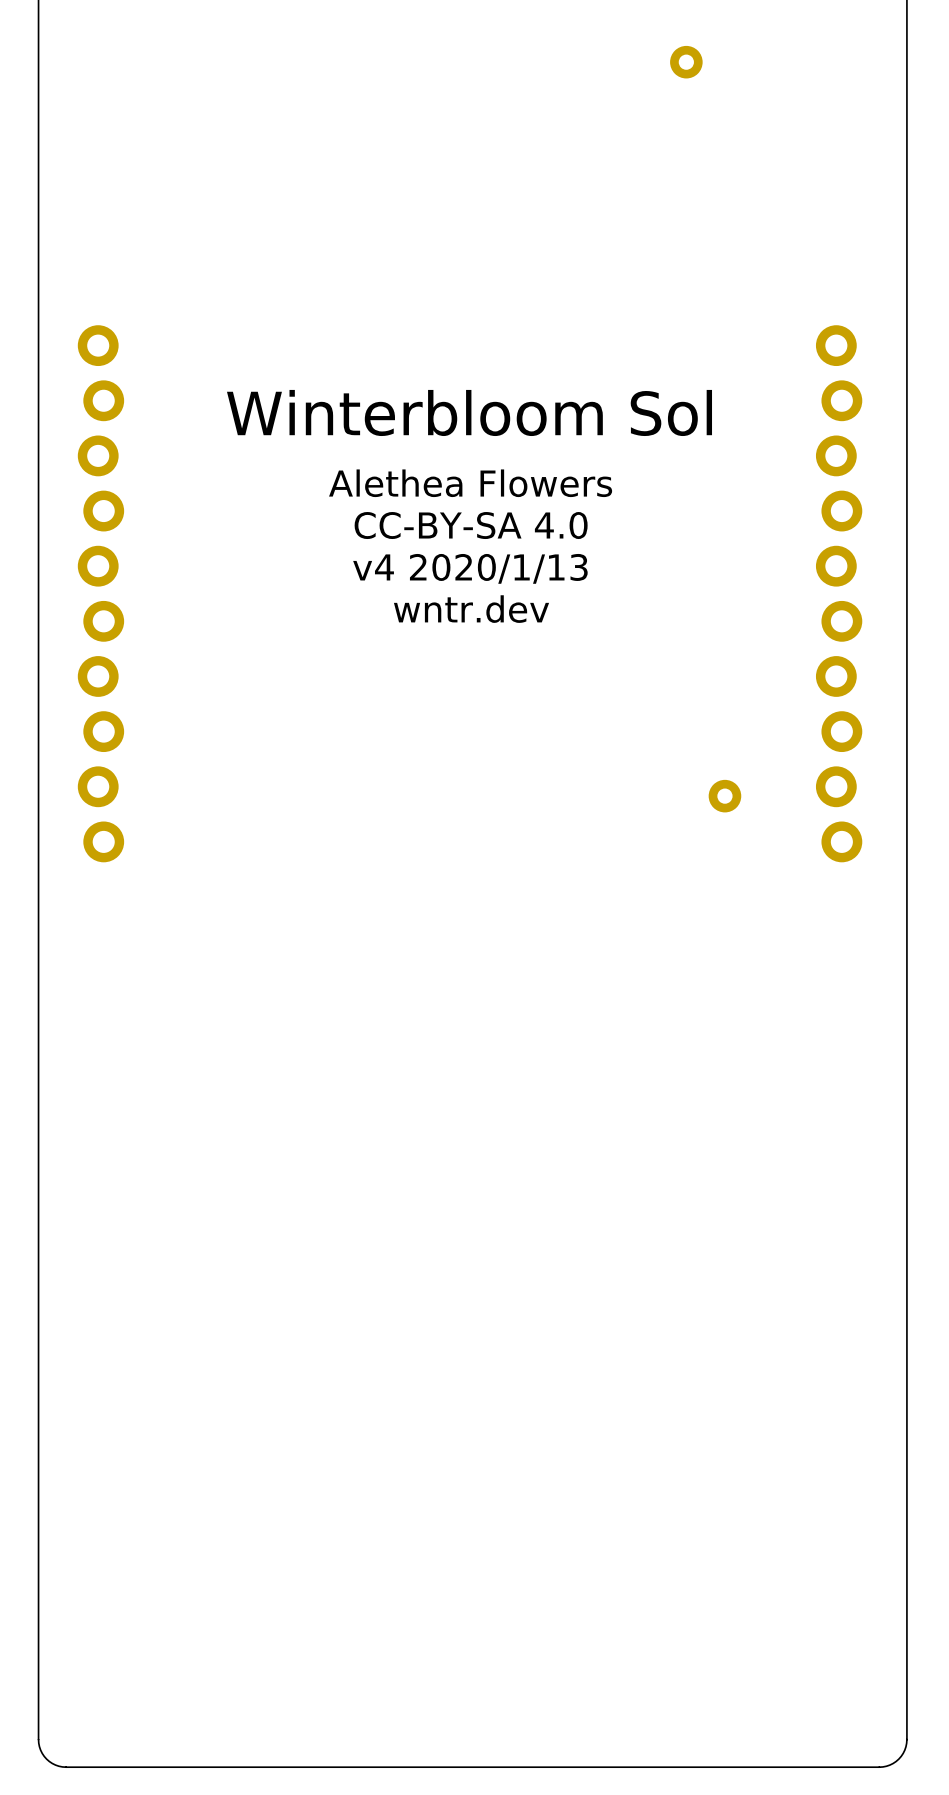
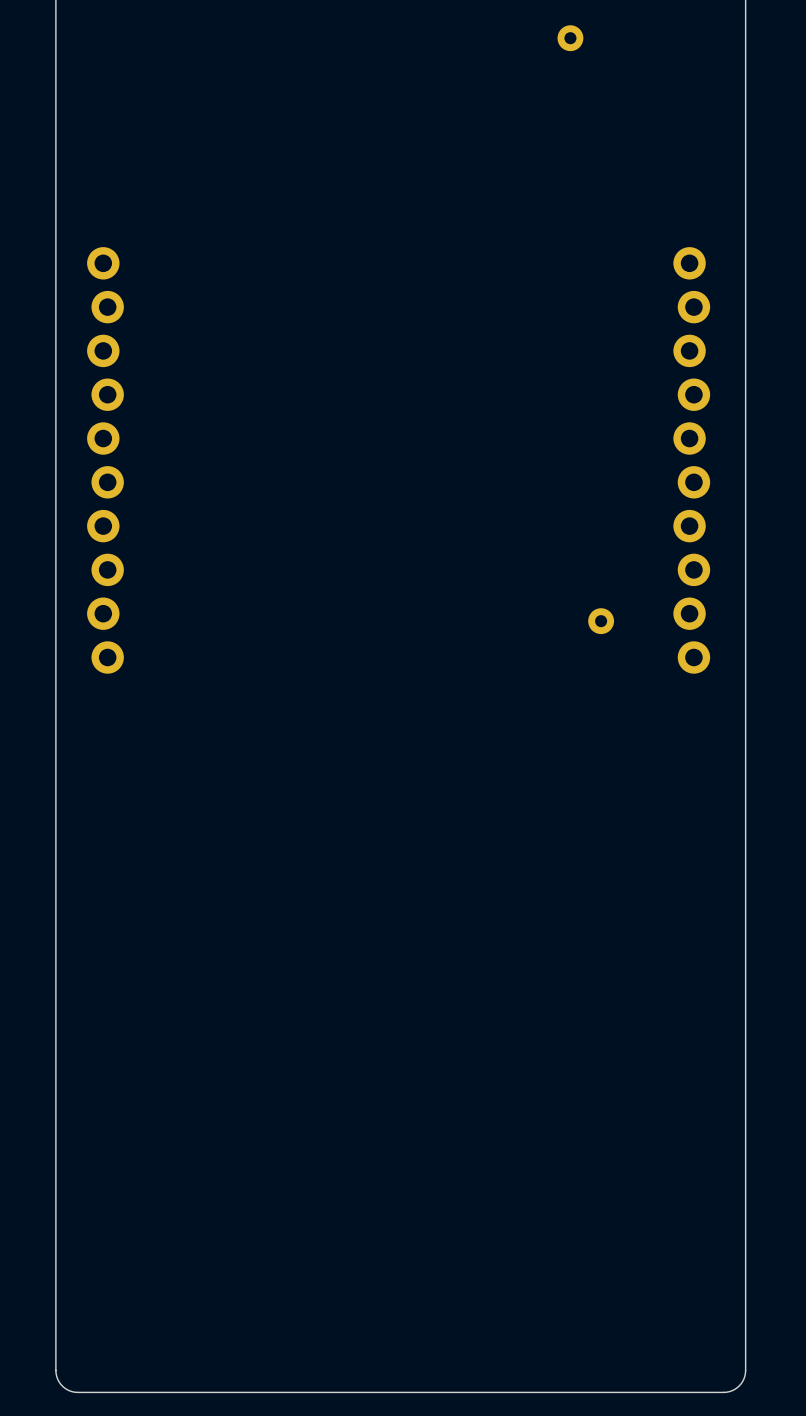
text: Winterbloom Sol (469, 412) -> none
text: Alethea Flowers (470, 483) -> none
text: CC-BY-SA 4.0 (471, 525) -> none
text: v4 2020/1/13 (470, 568) -> none
text: wntr.dev (471, 609) -> none

